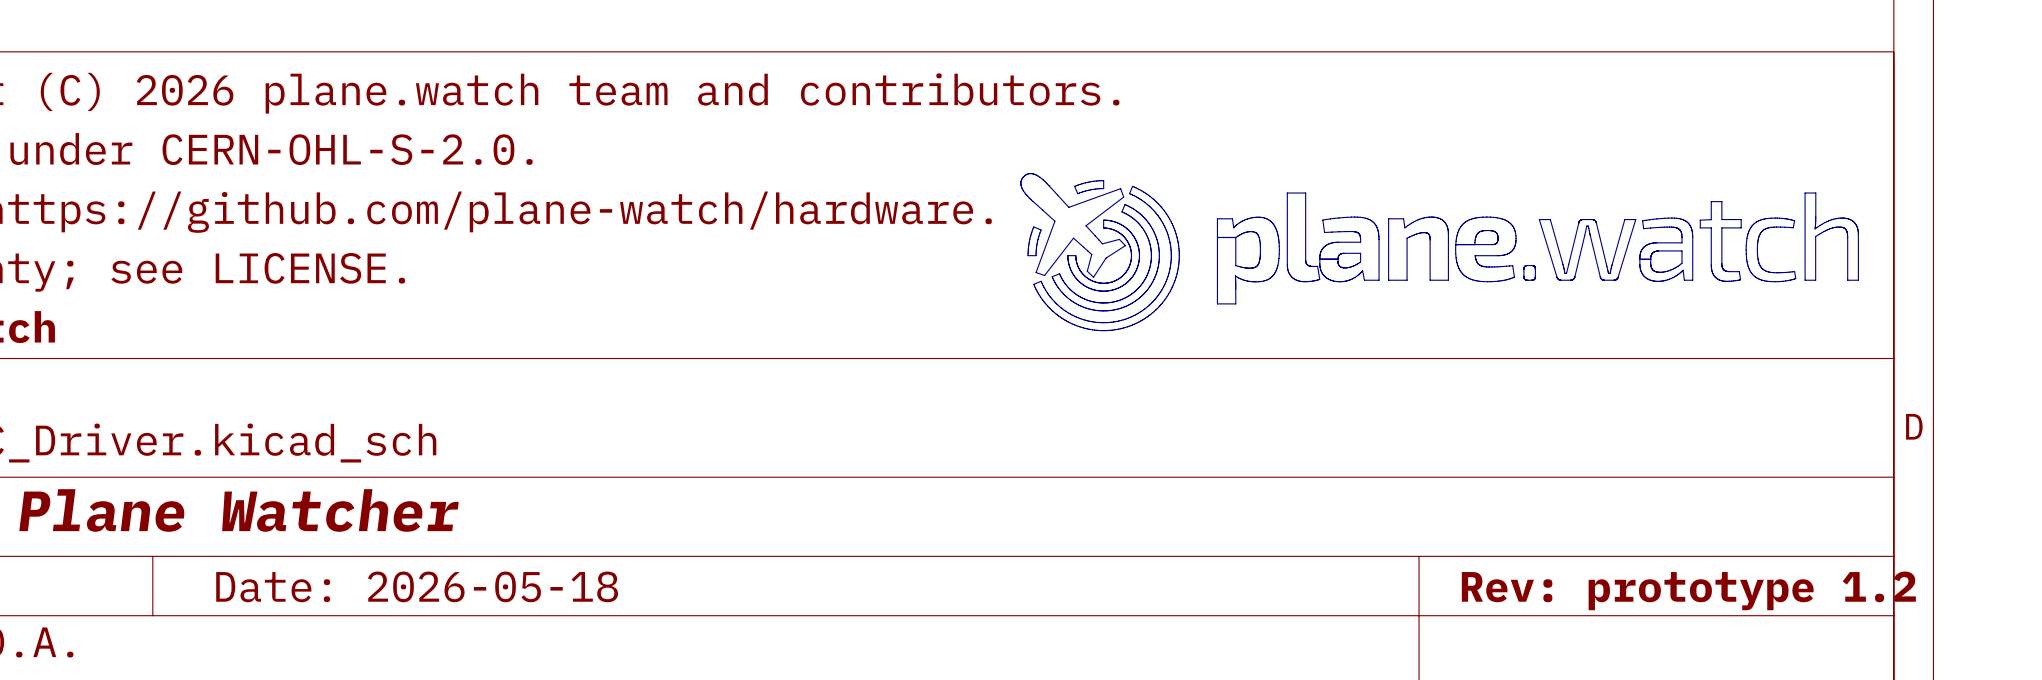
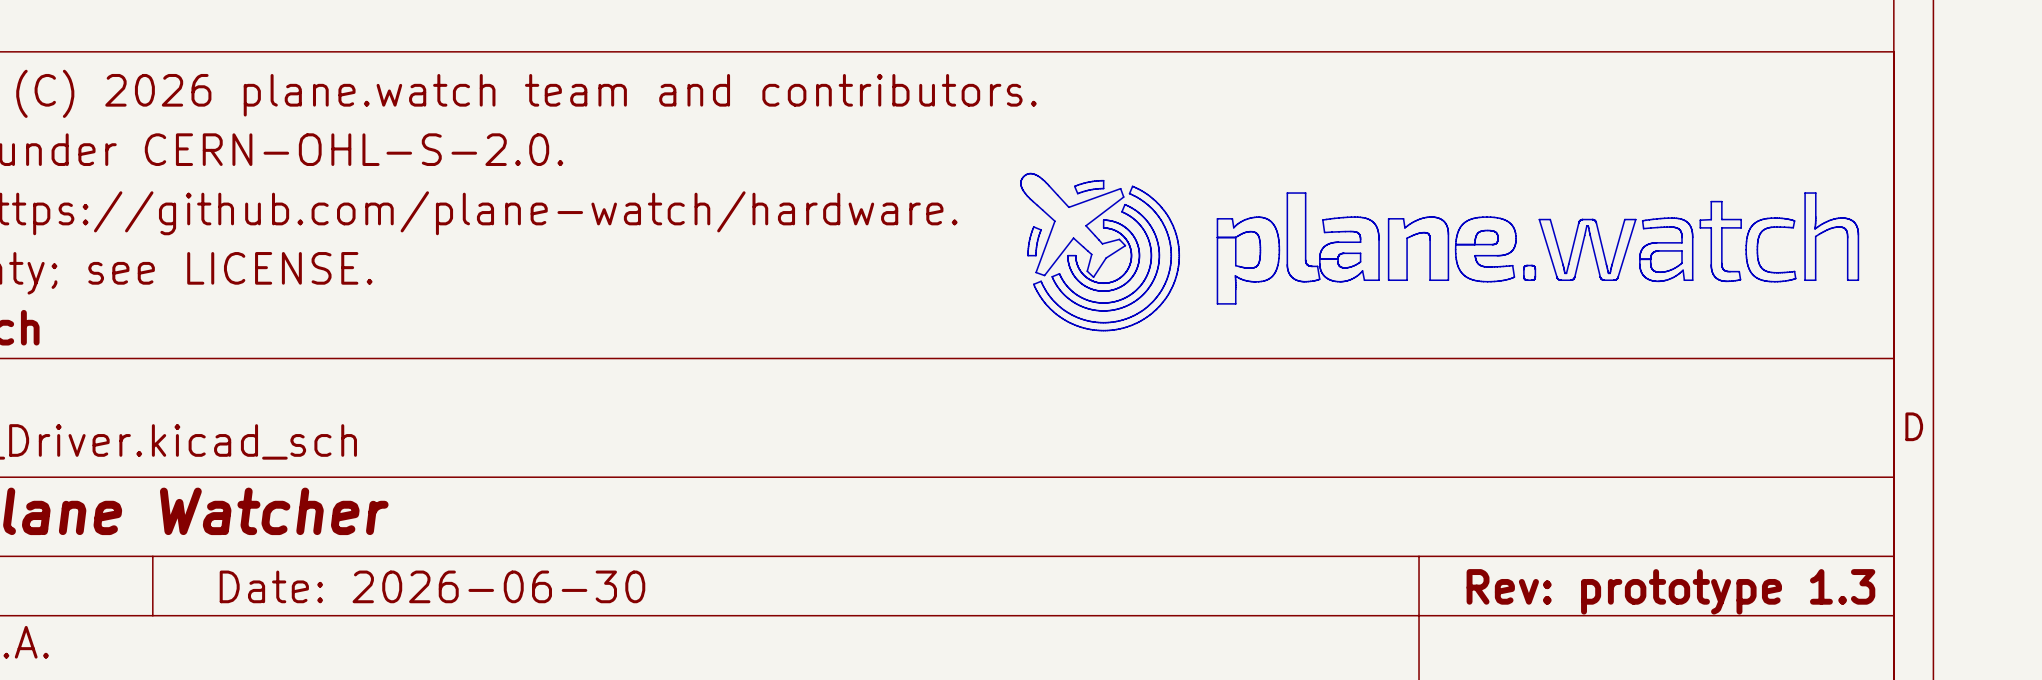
title block: Date: 2026-05-18 (417, 586) -> Date: 2026-06-30 (432, 586)
title block: Rev: prototype 1.2 (1688, 590) -> Rev: prototype 1.3 (1670, 591)

